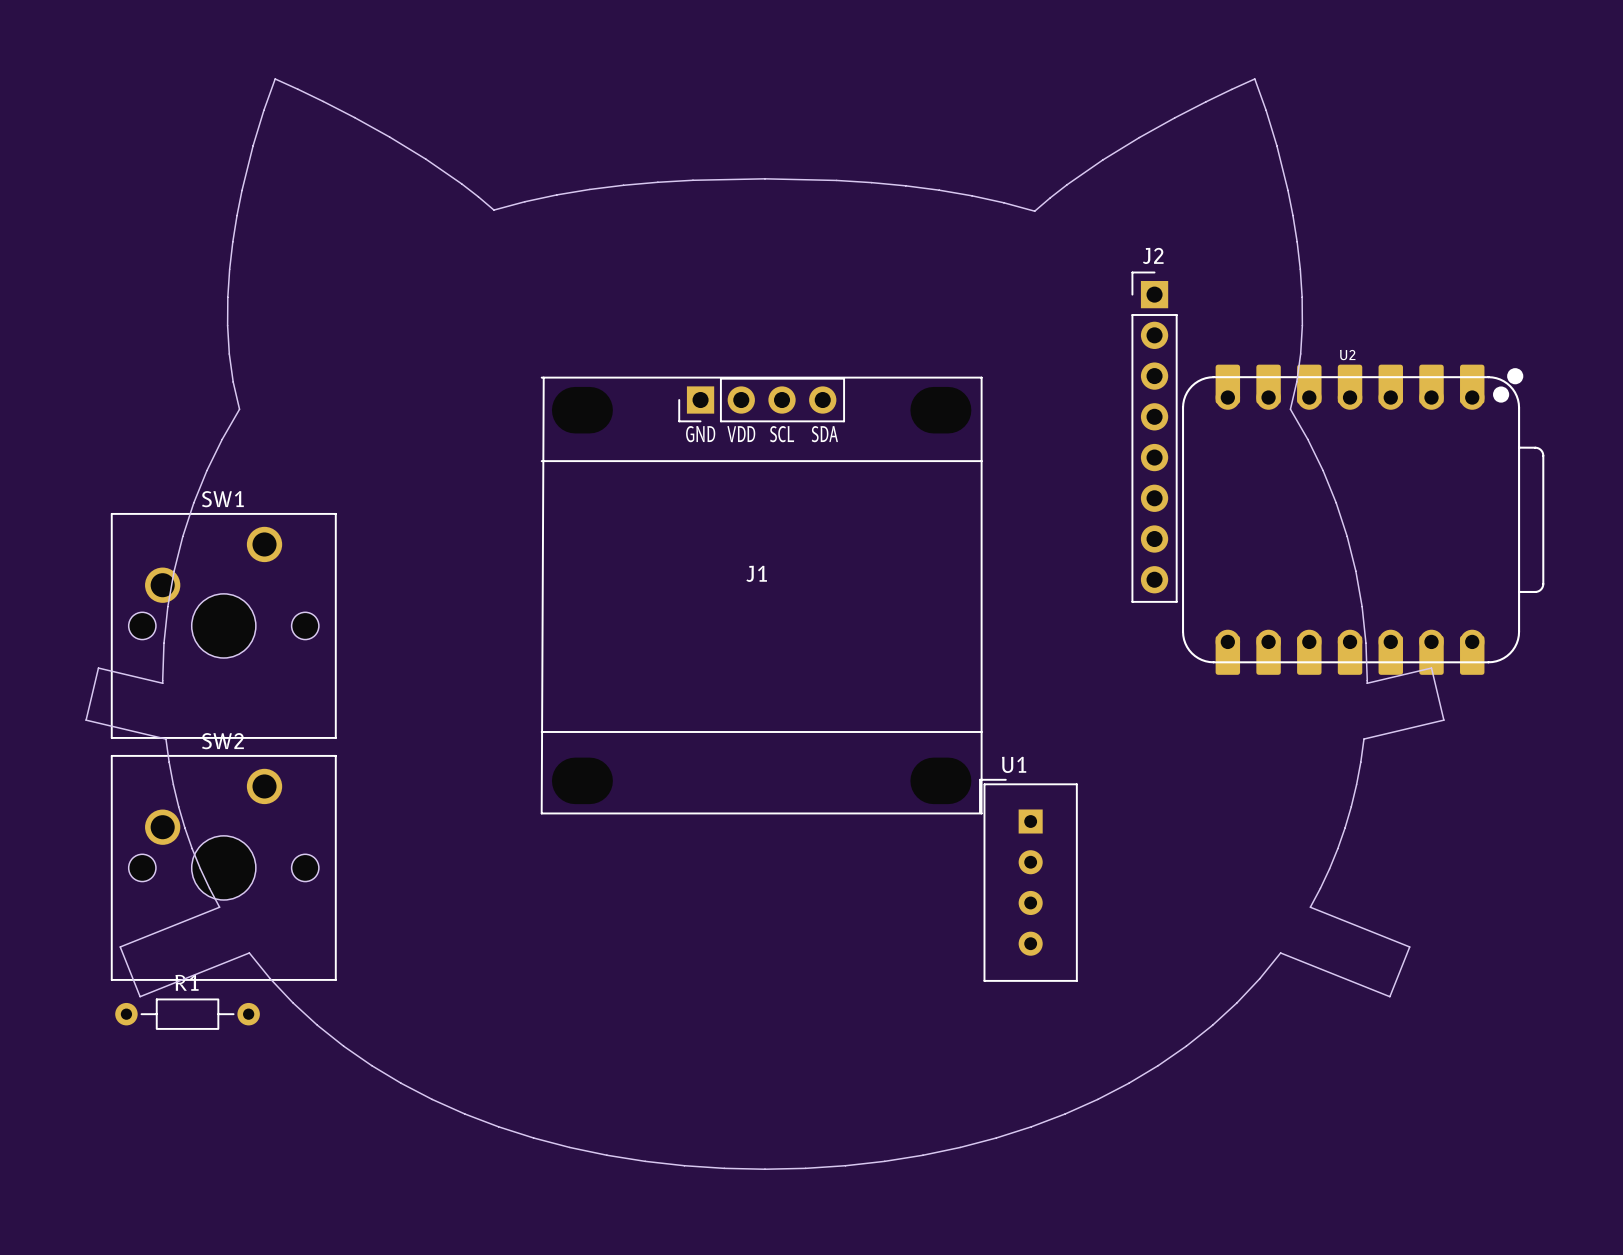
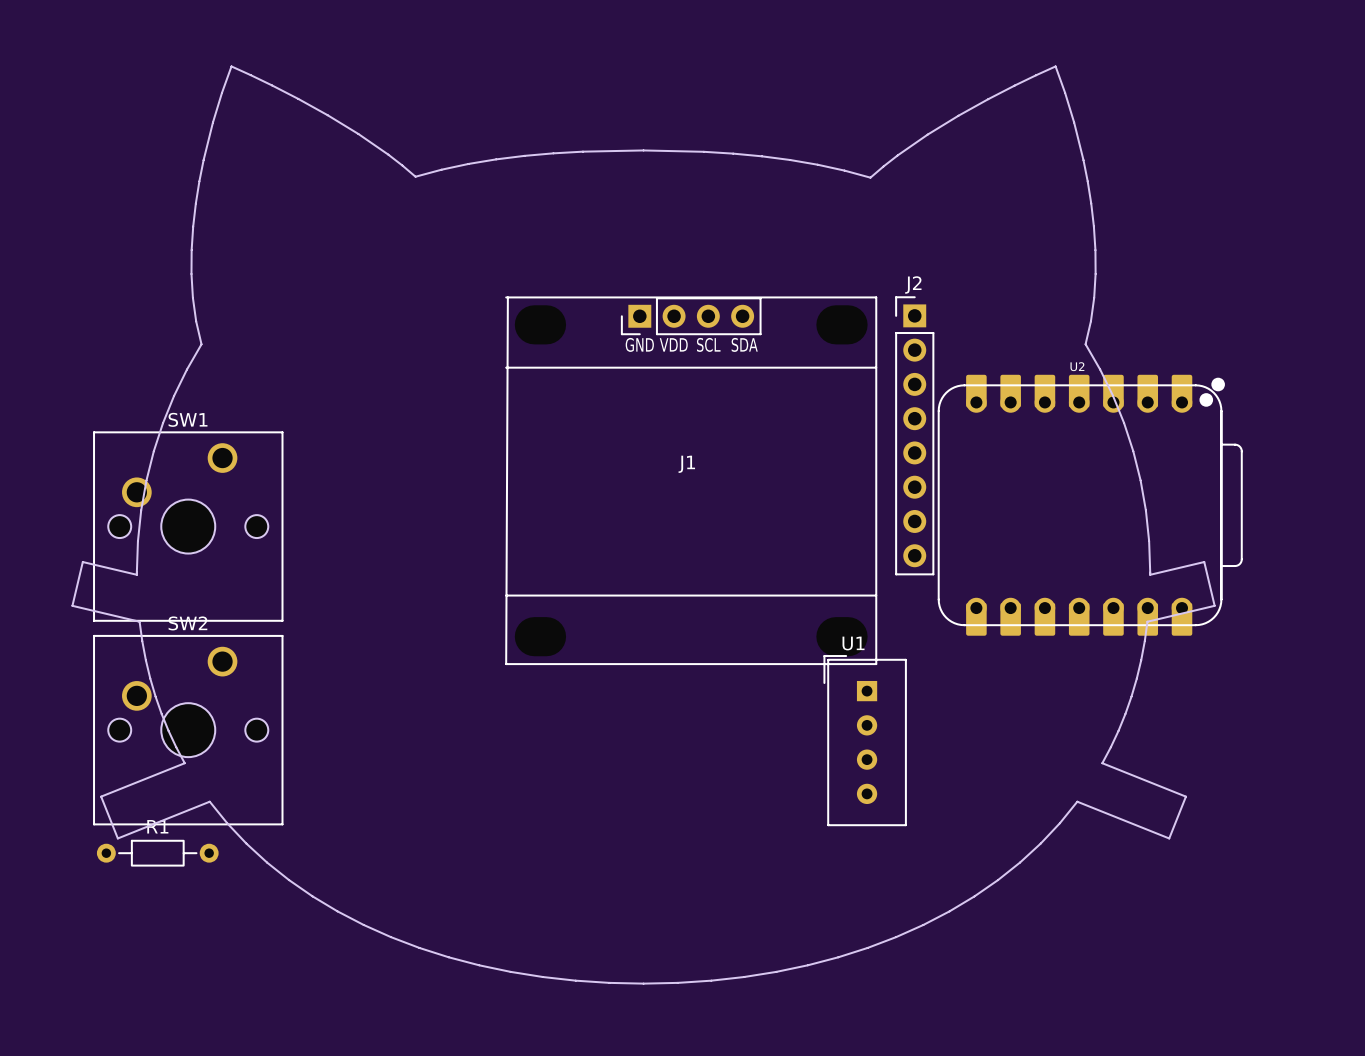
J2 position: (1154, 437) -> (914, 435)
U2 position: (1363, 519) -> (1090, 505)
J1 position: (761, 595) -> (691, 480)

